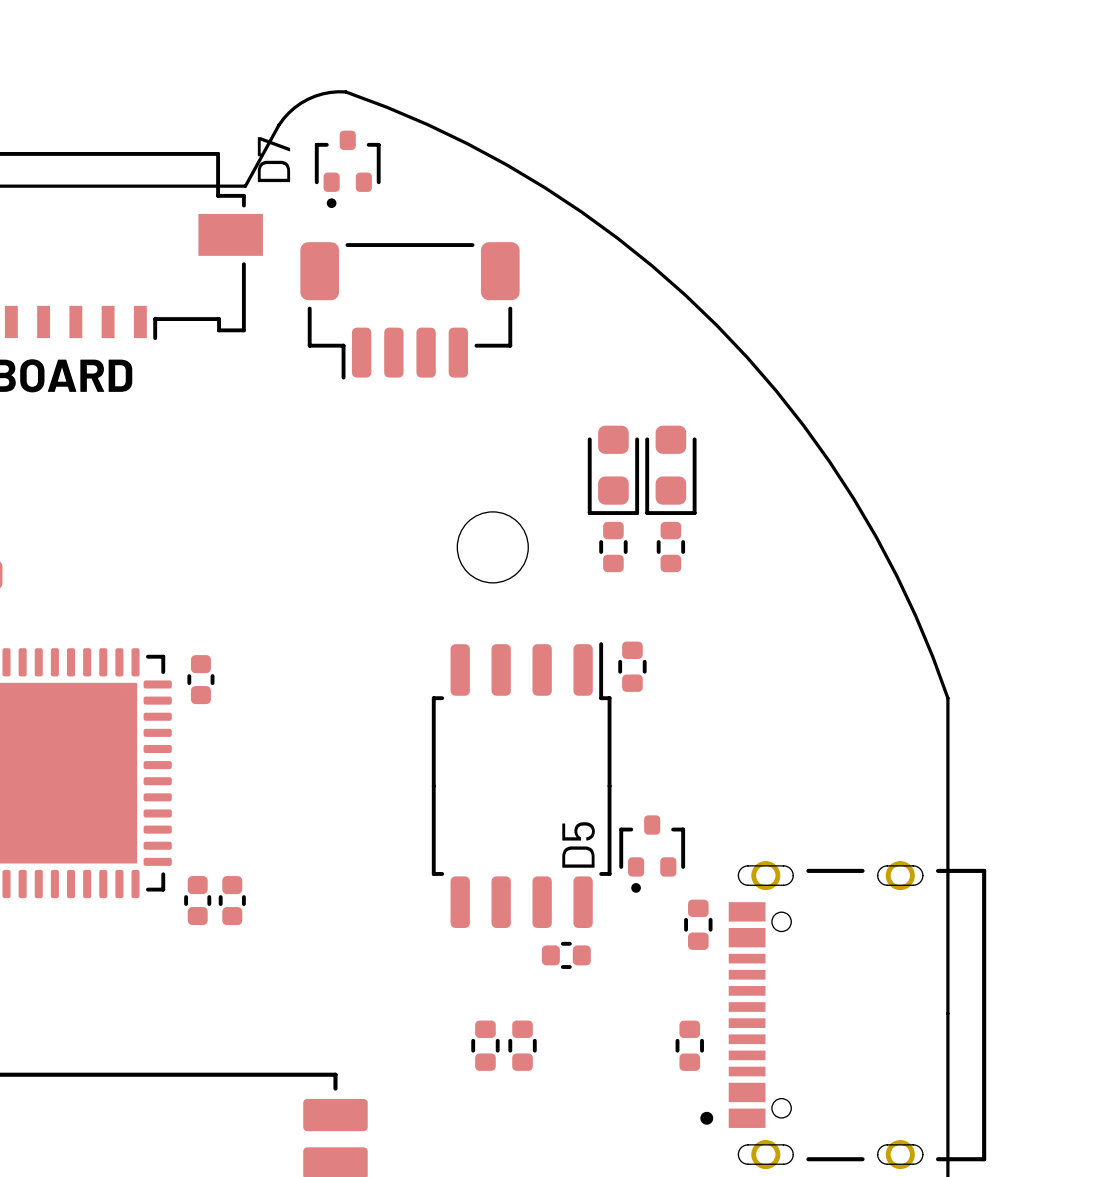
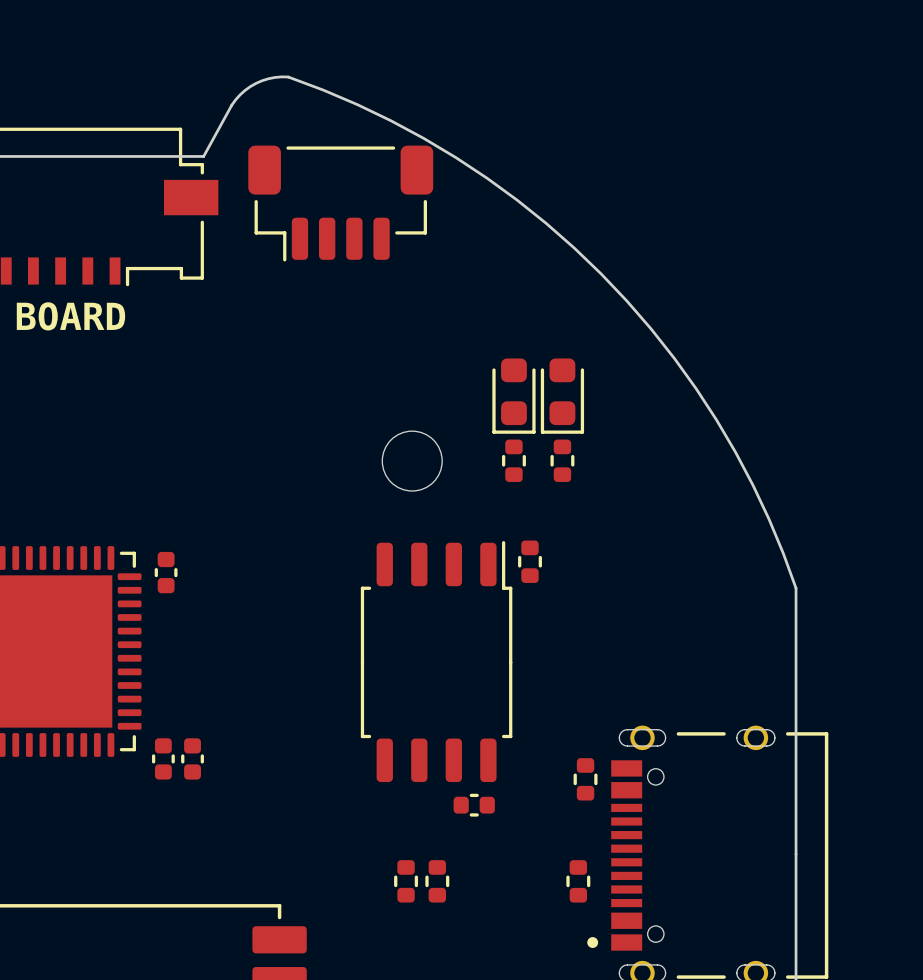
D7: (347, 169) -> none
part position: (409, 310) -> (340, 203)
D5: (652, 854) -> none

